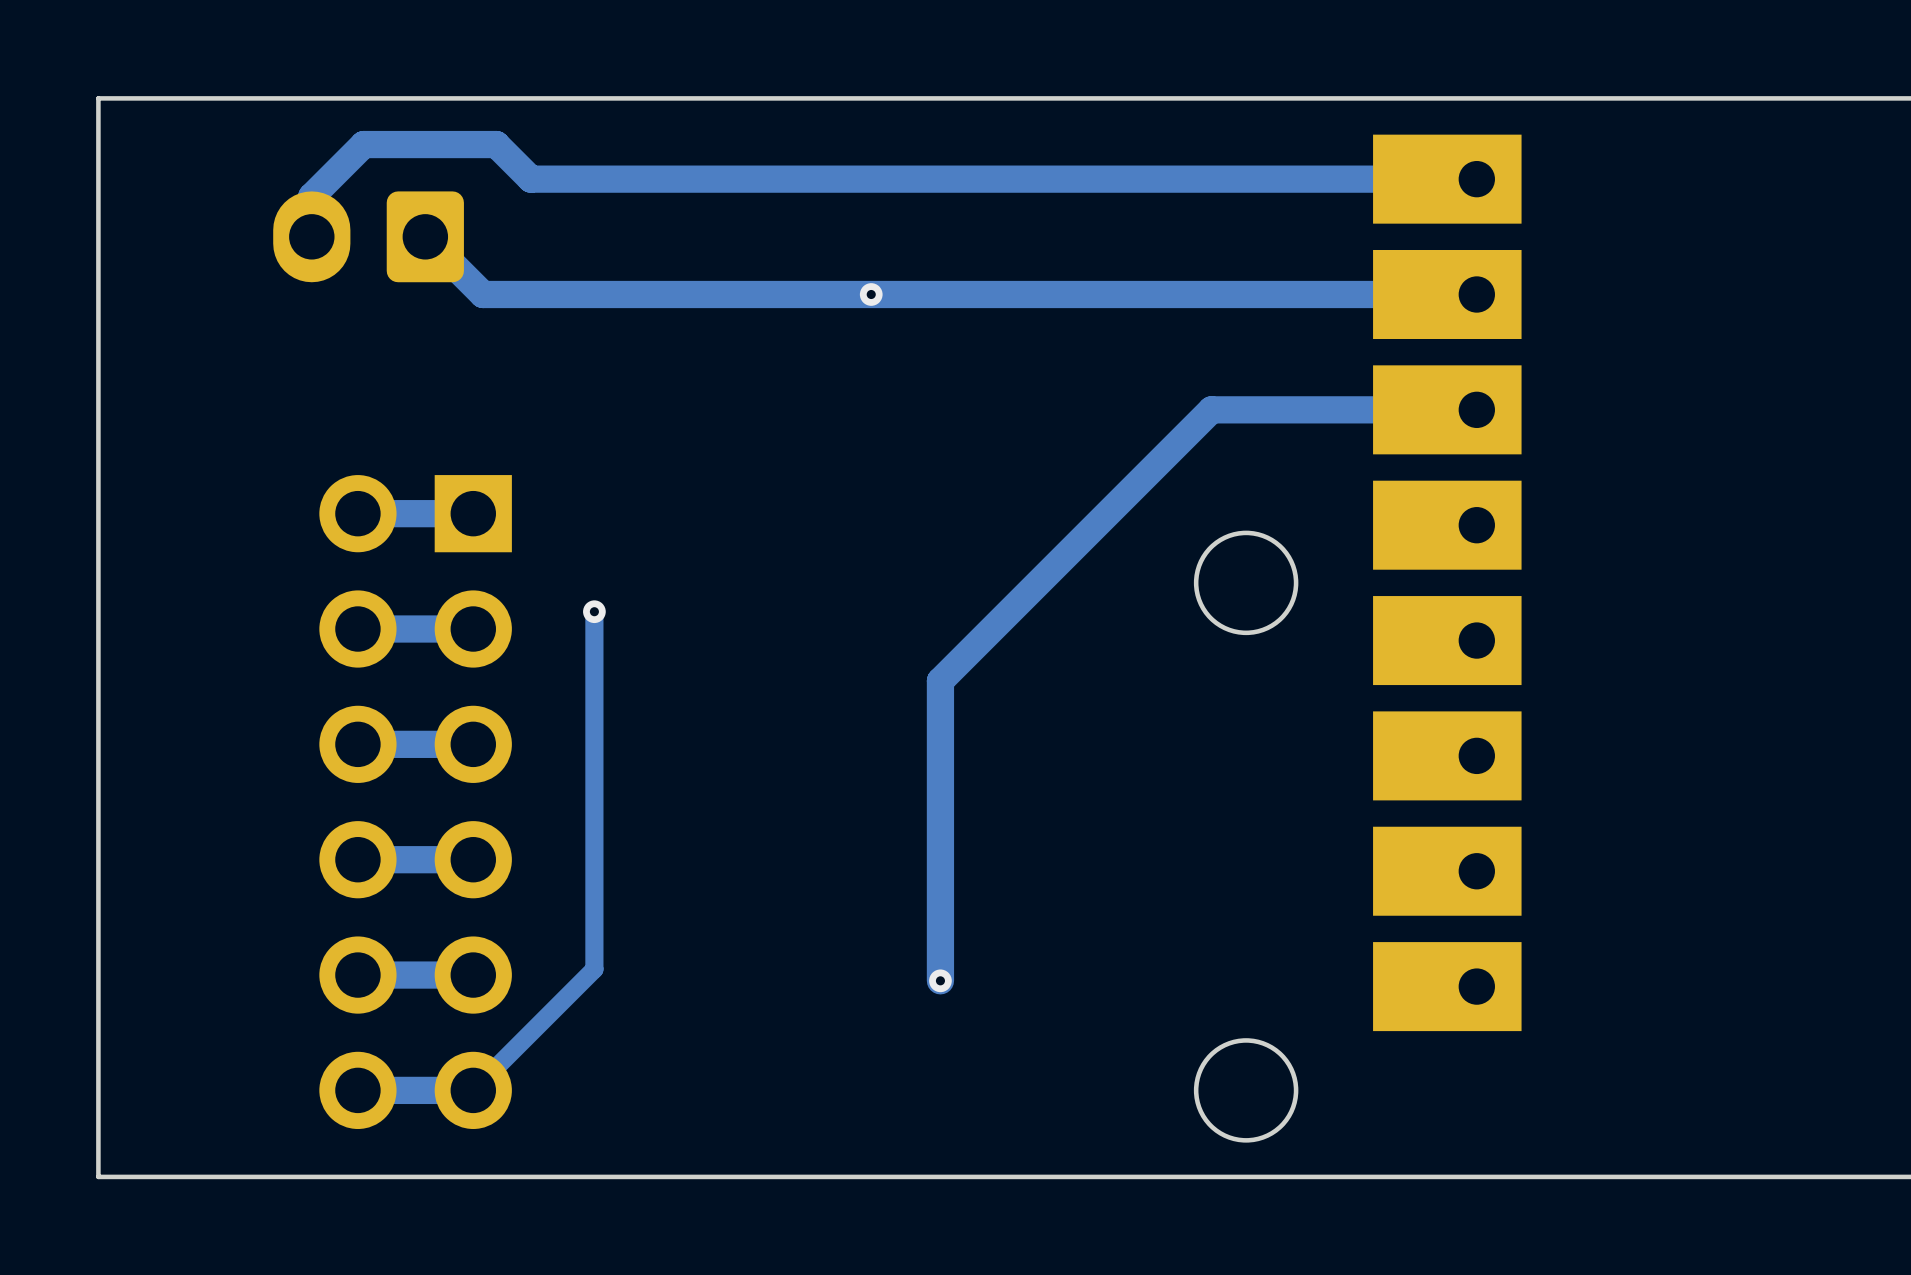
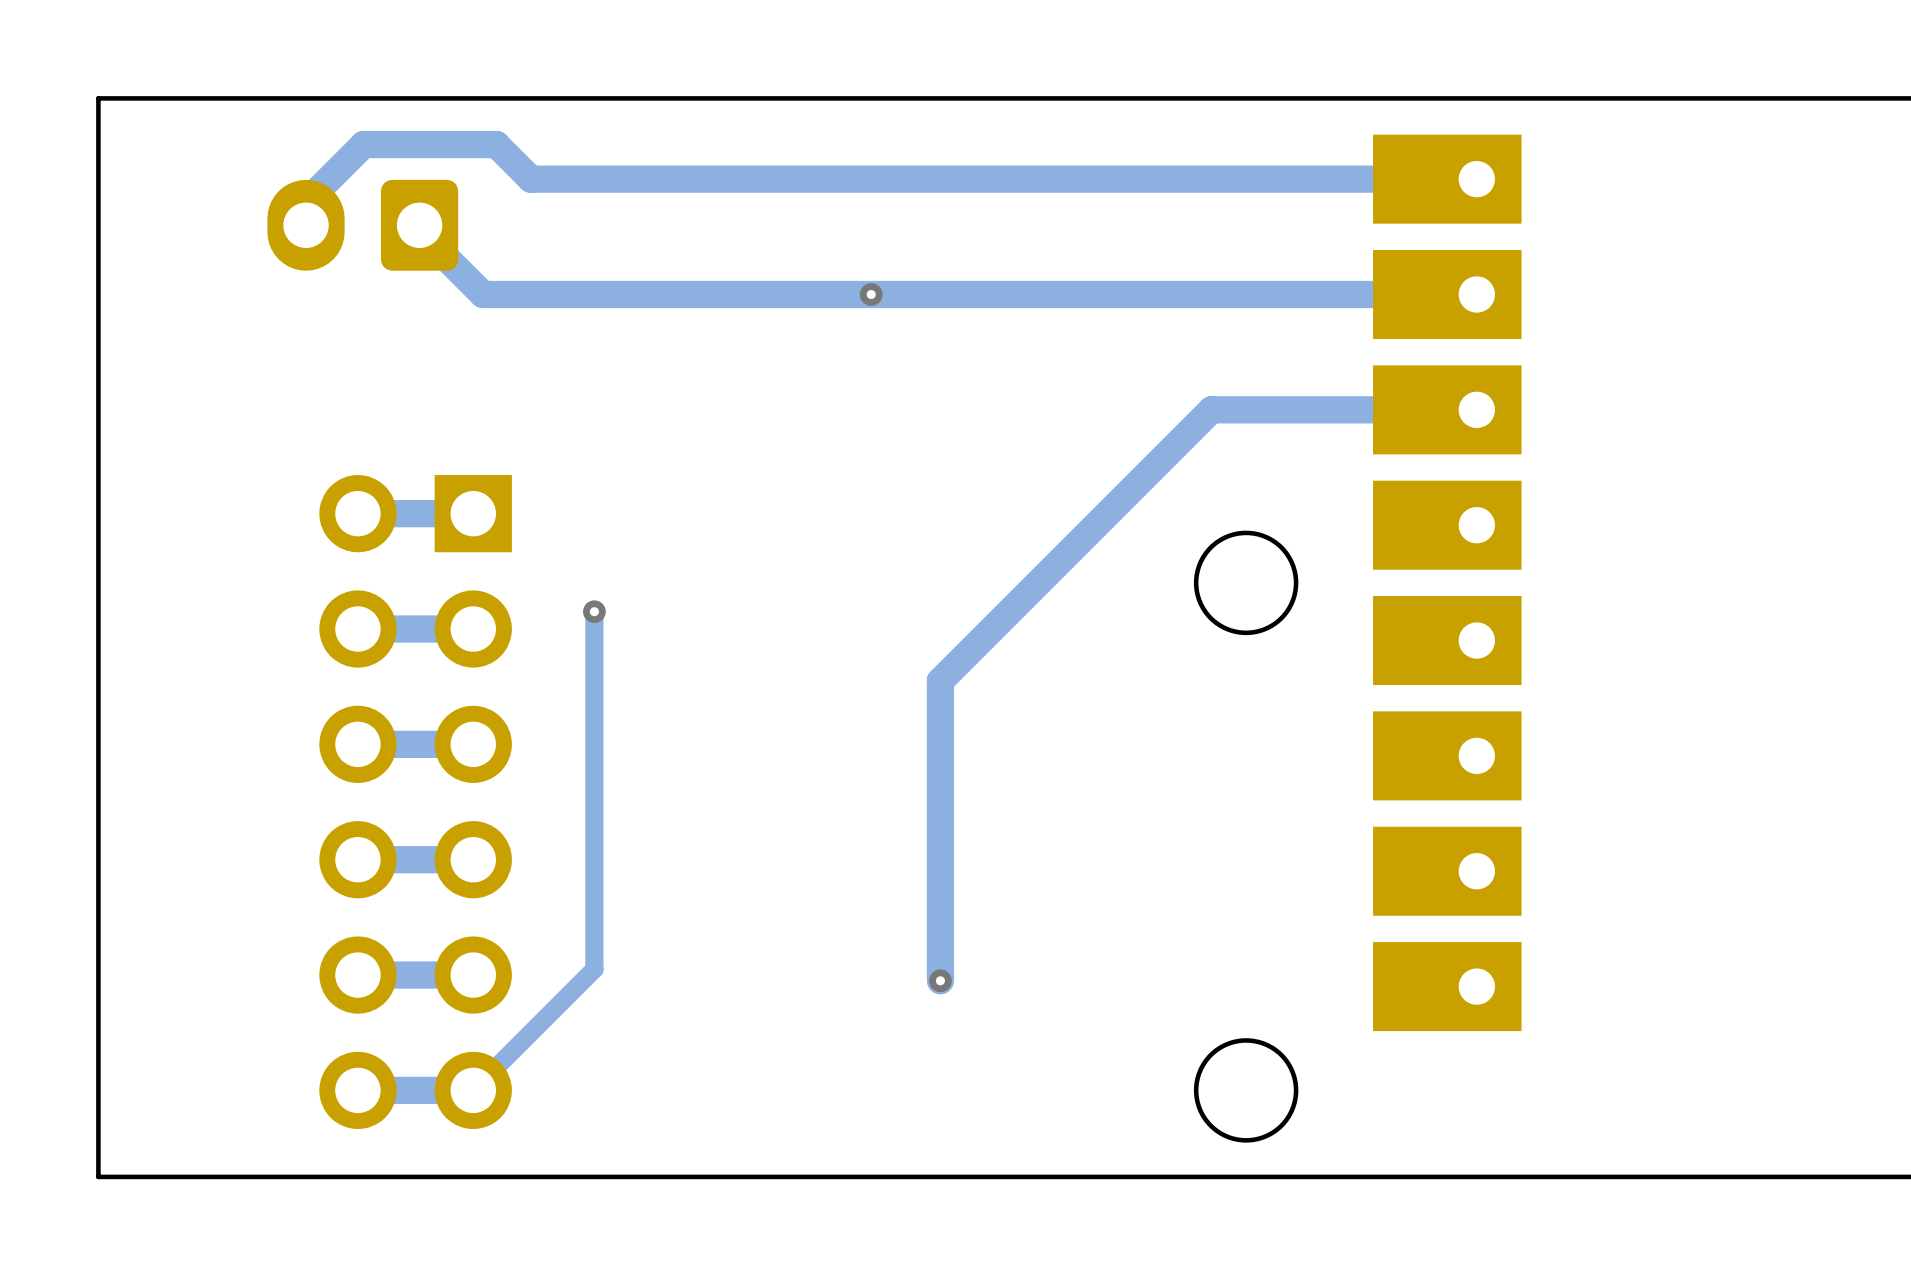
part position: (368, 236) -> (362, 225)

